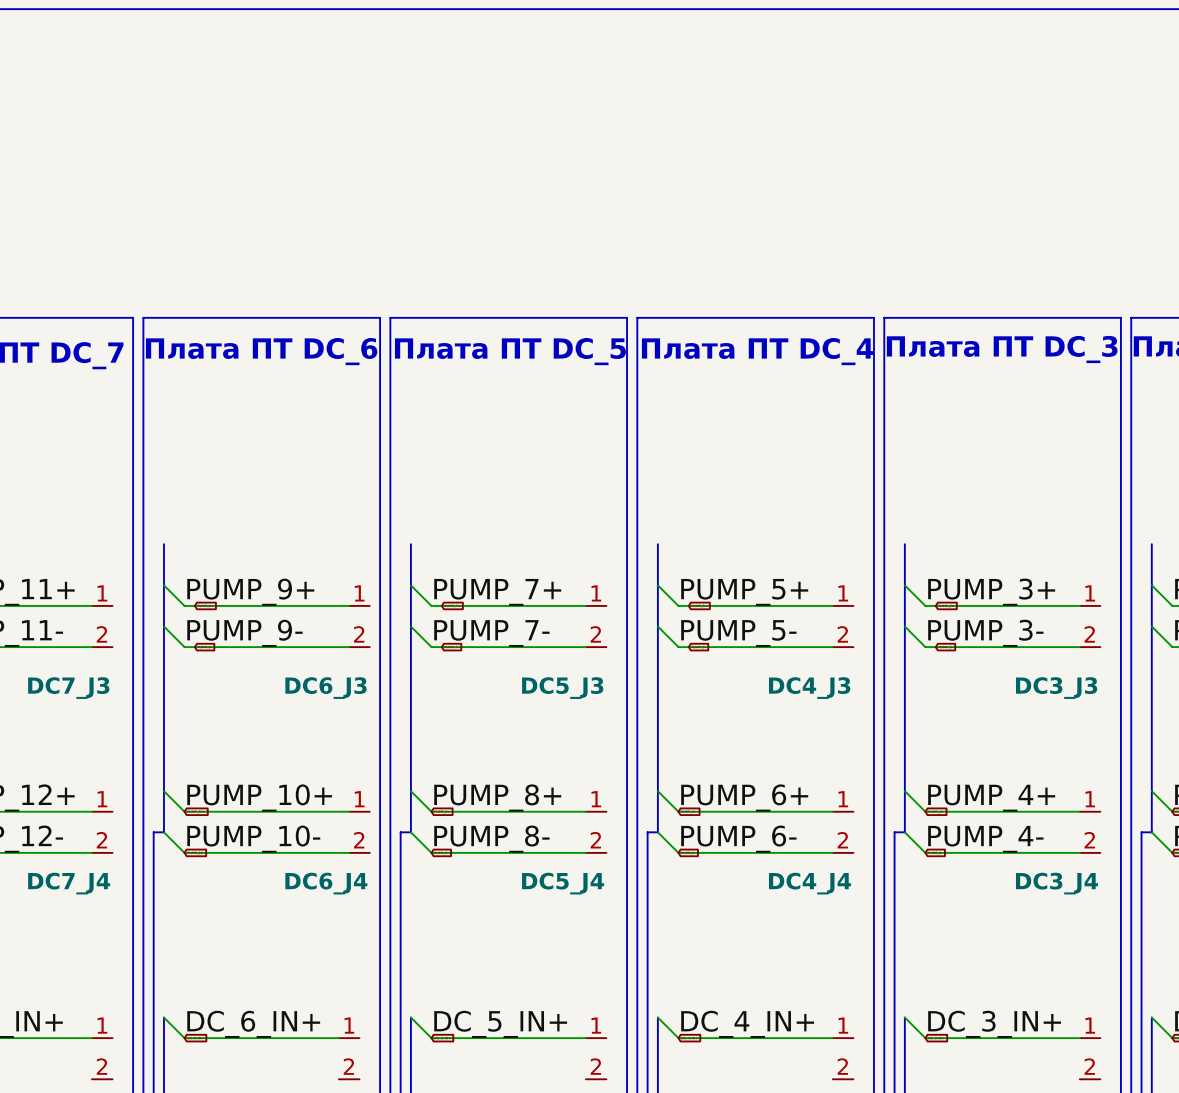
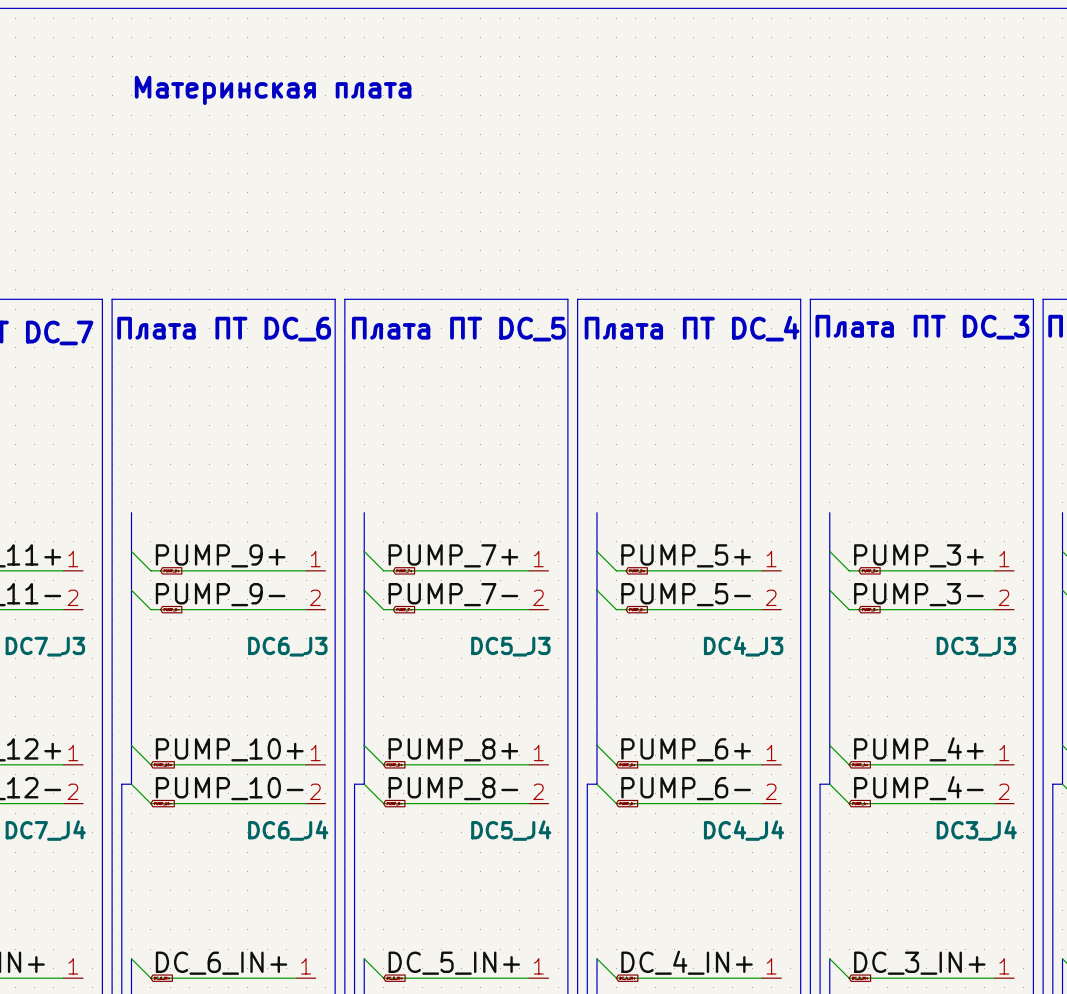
text: none -> Материнская плата (273, 90)

